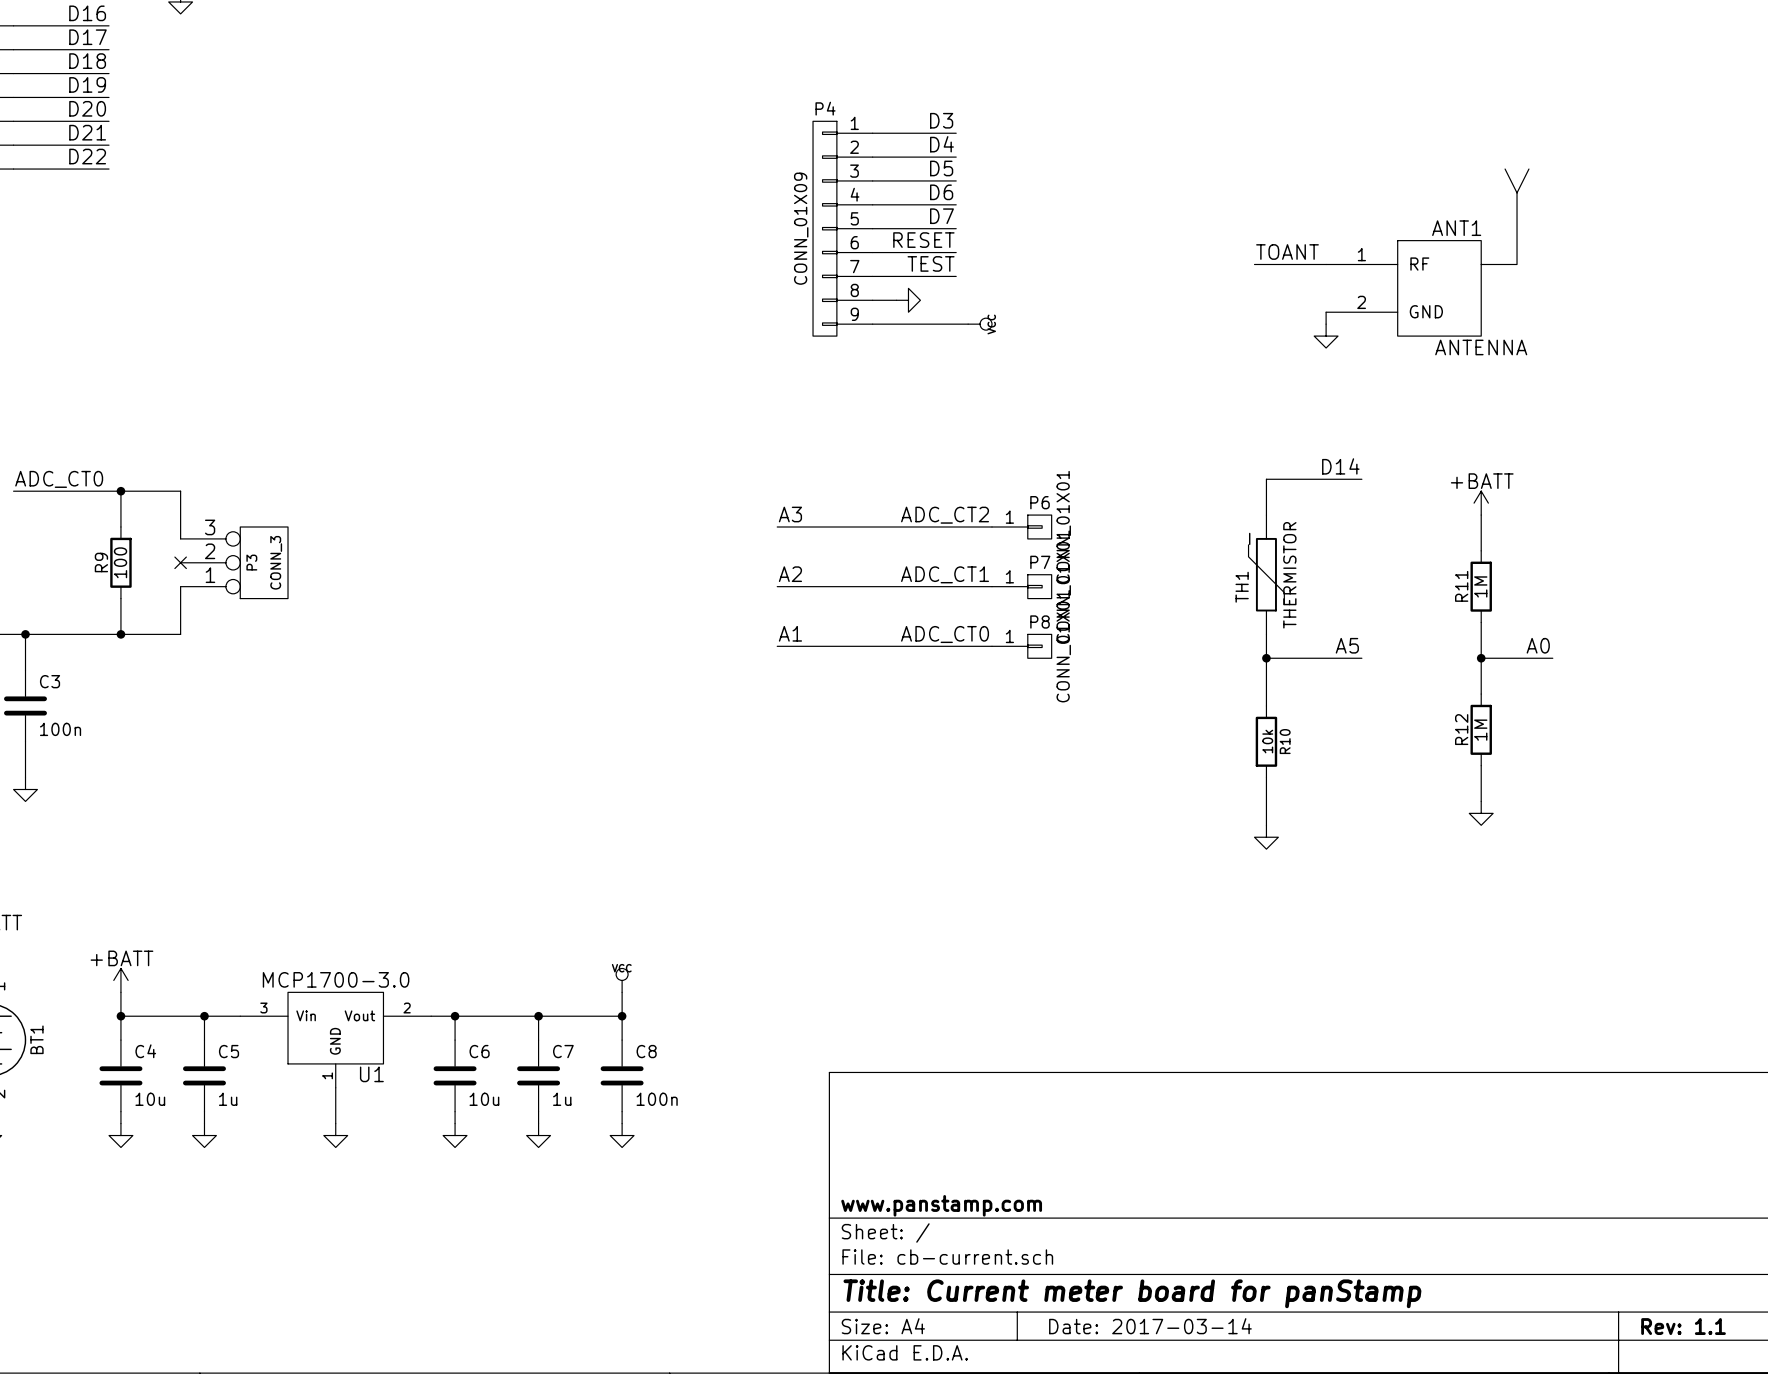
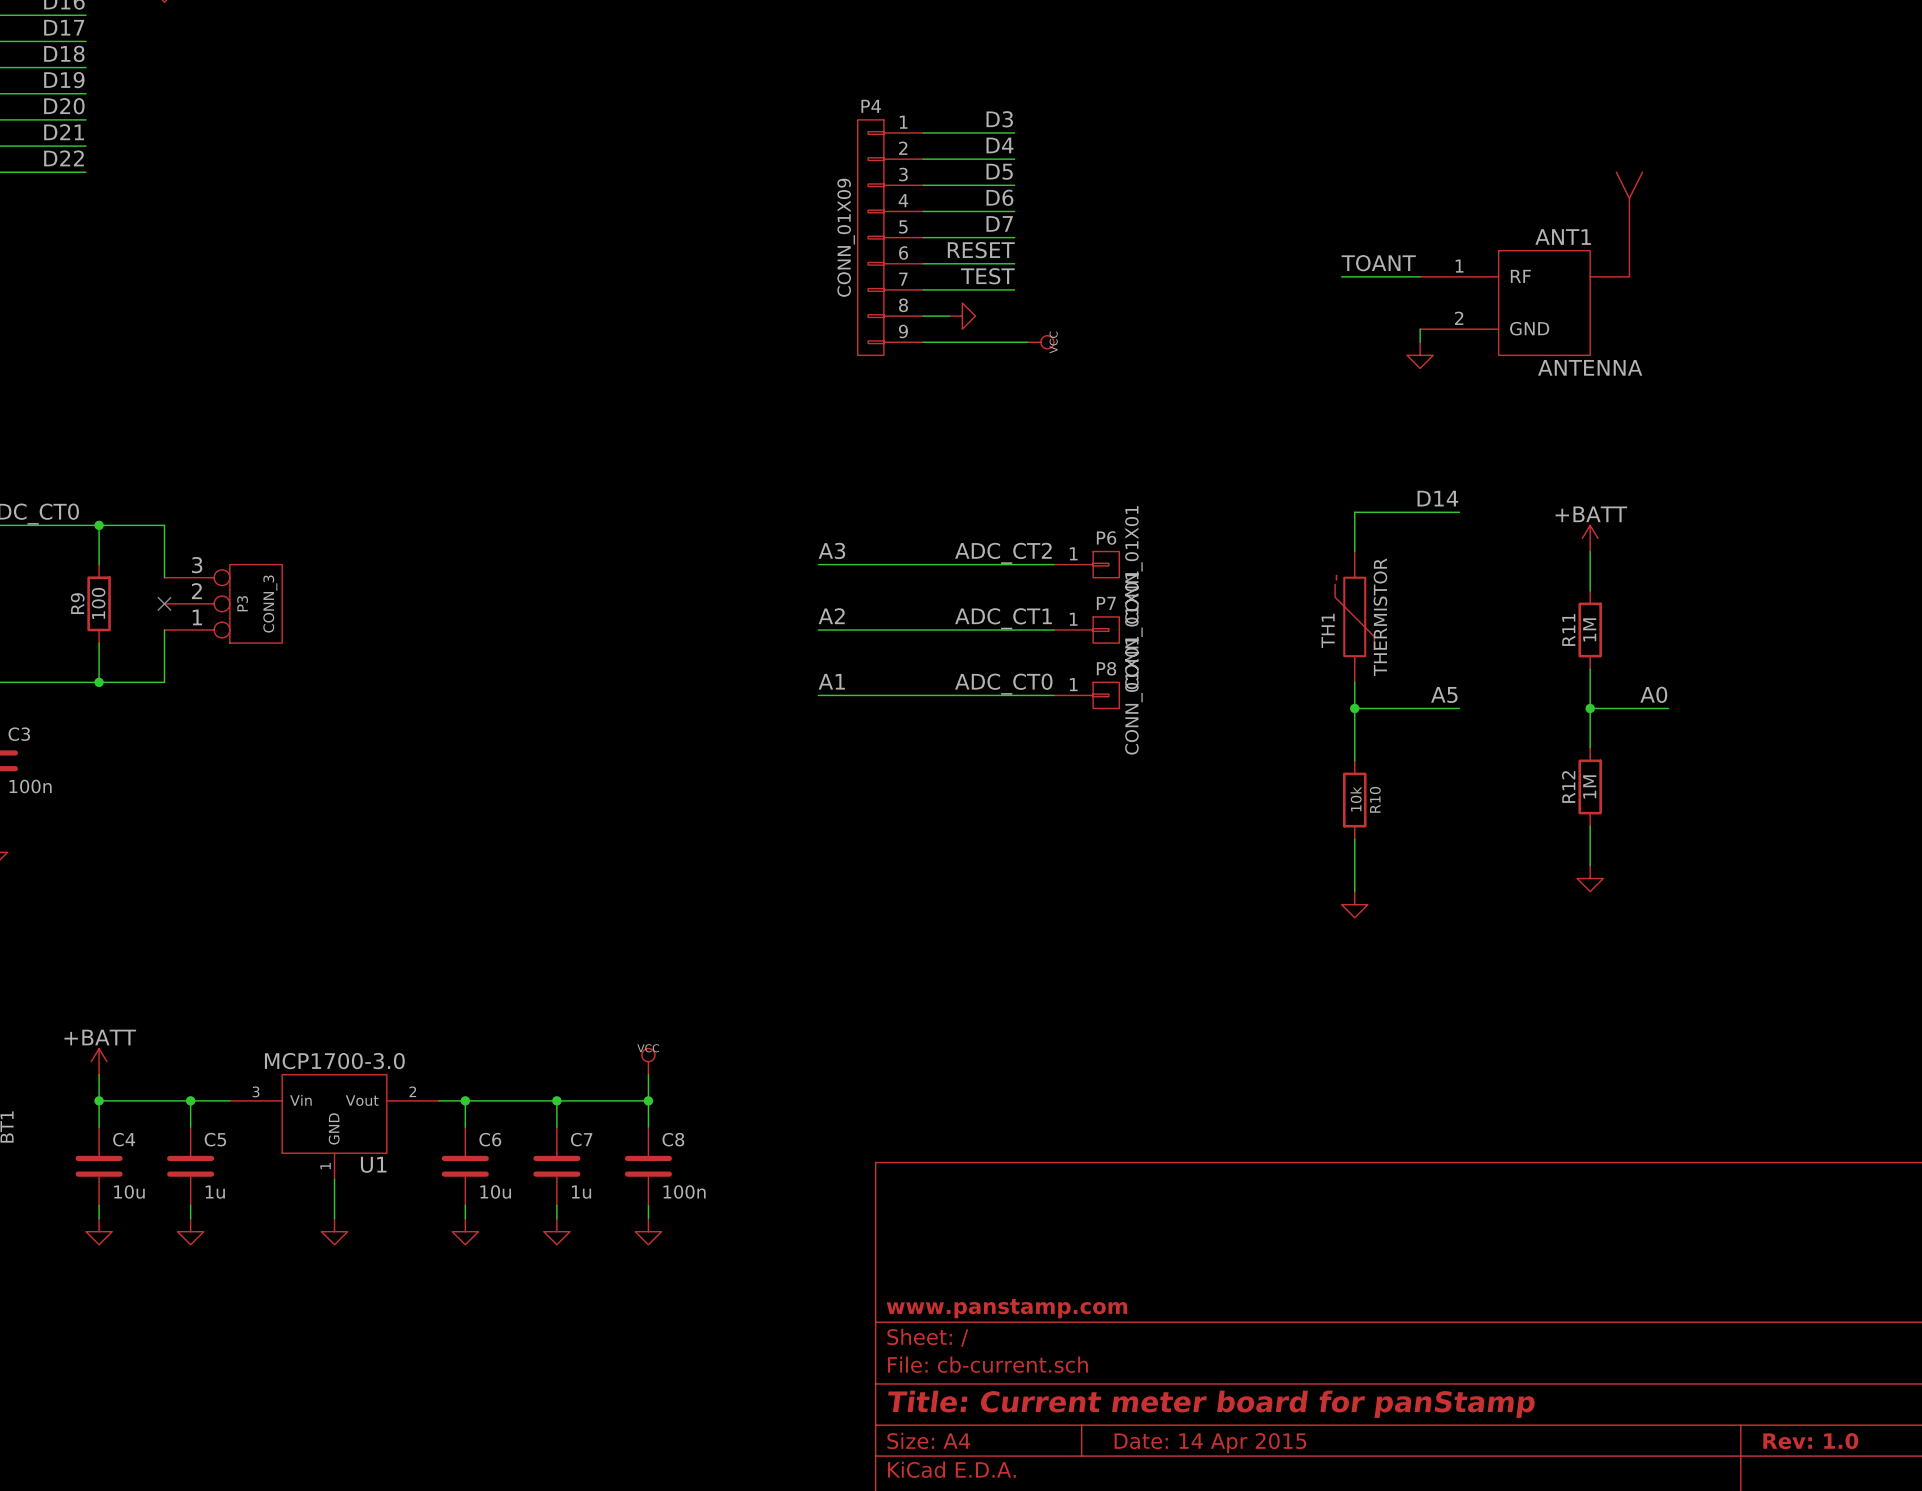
title block: Date: 2017-03-14 (1150, 1326) -> Date: 14 Apr 2015 (1210, 1443)
title block: Rev: 1.1 (1683, 1326) -> Rev: 1.0 (1810, 1441)

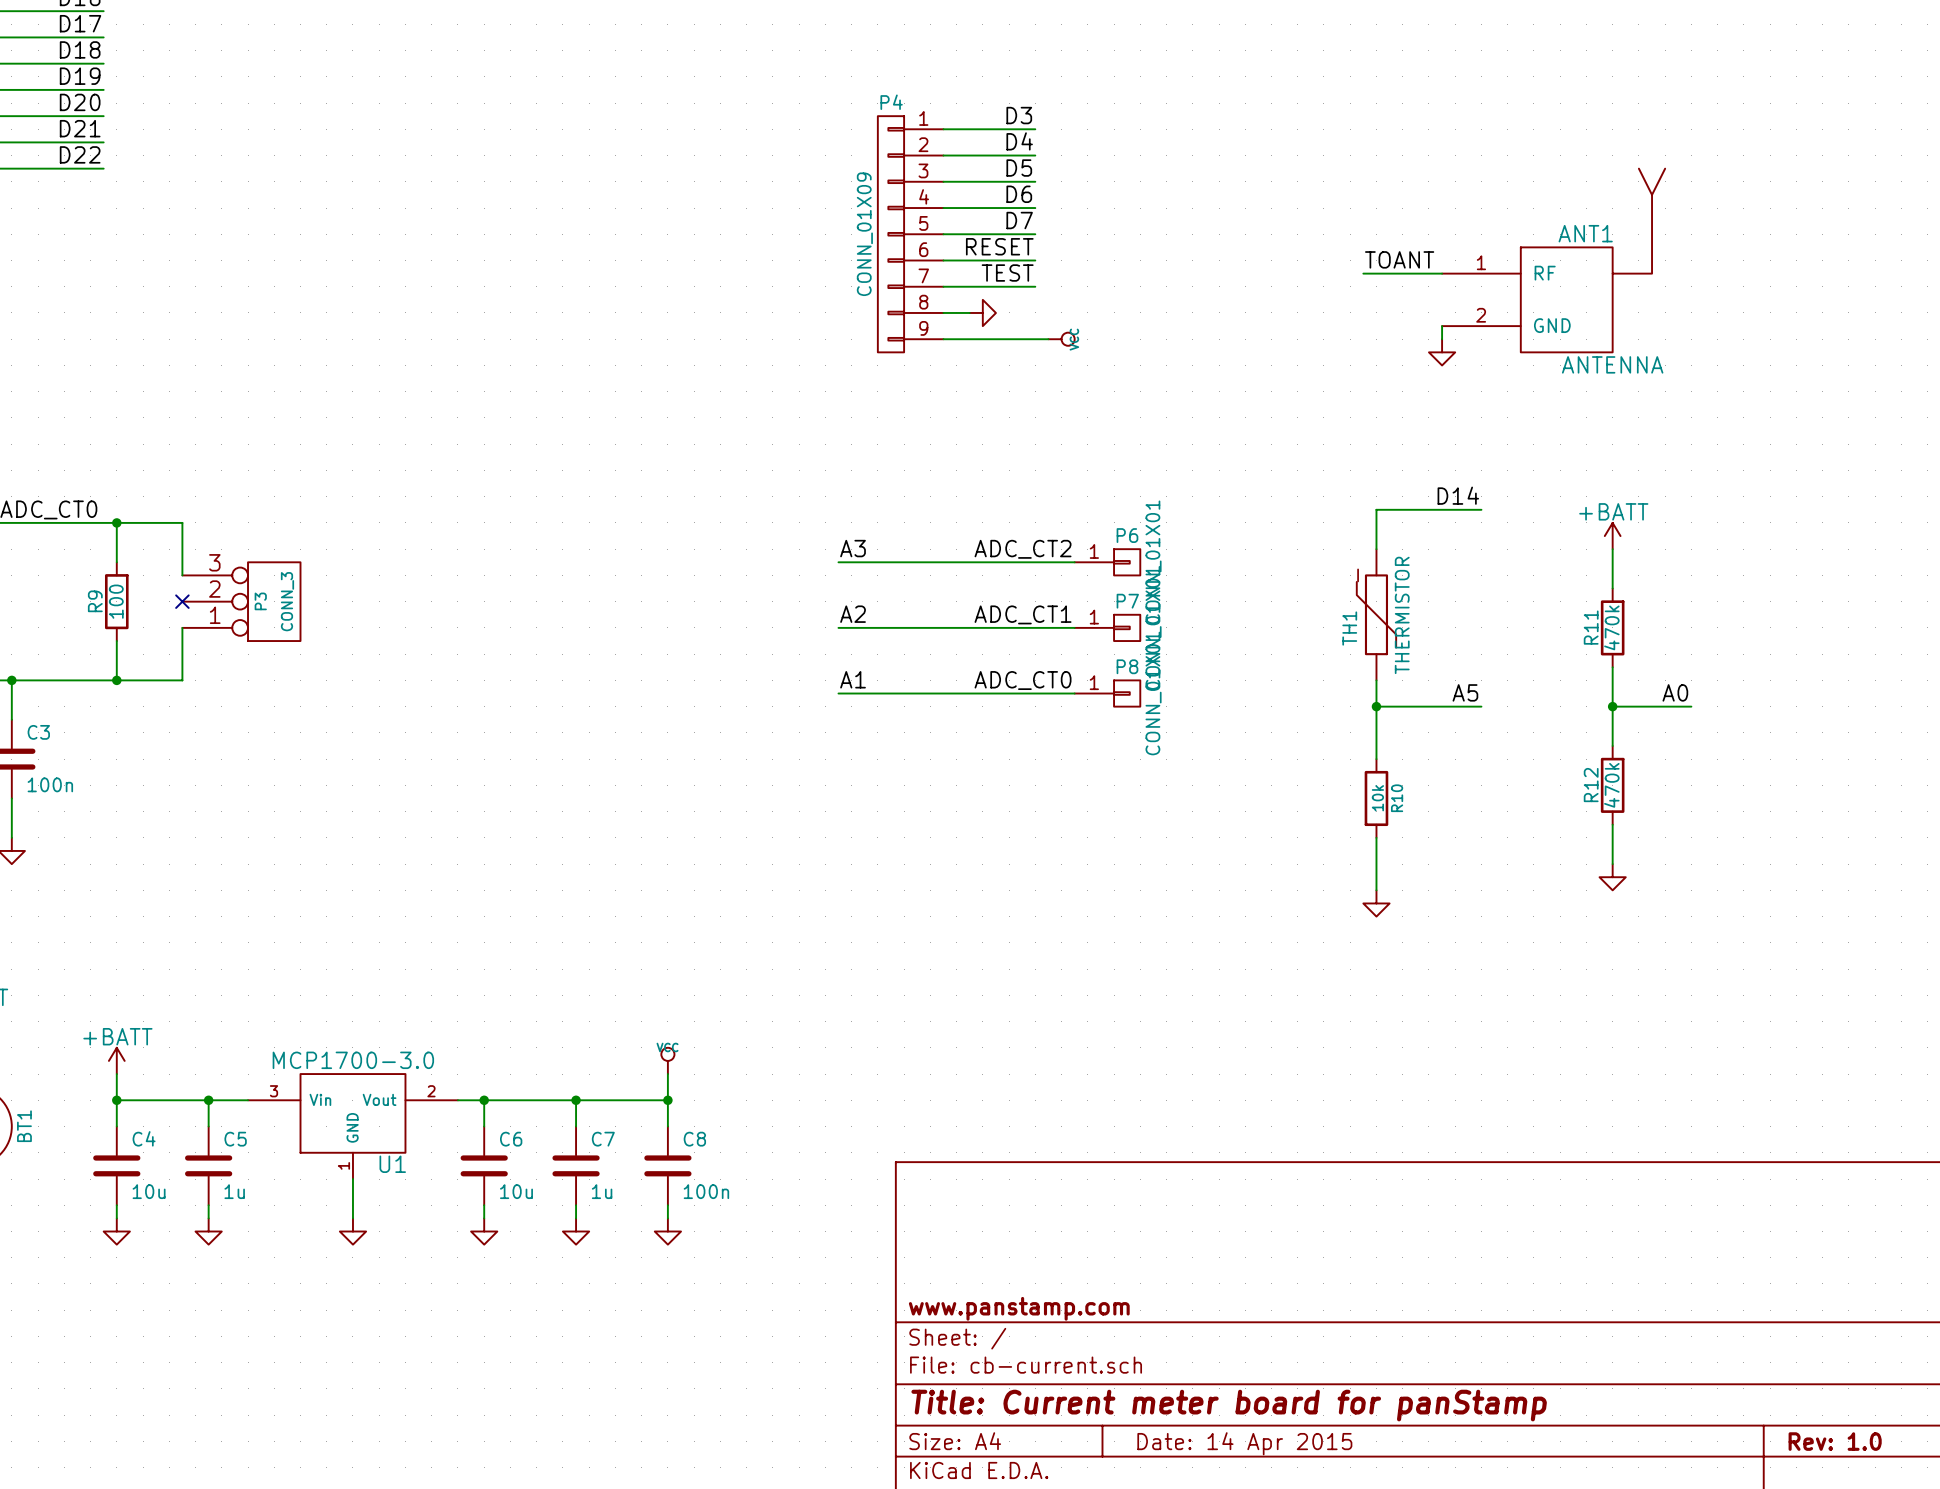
R11 value: 1M (1589, 629) -> 470k (1611, 627)
R12 value: 1M (1589, 786) -> 470k (1611, 785)

